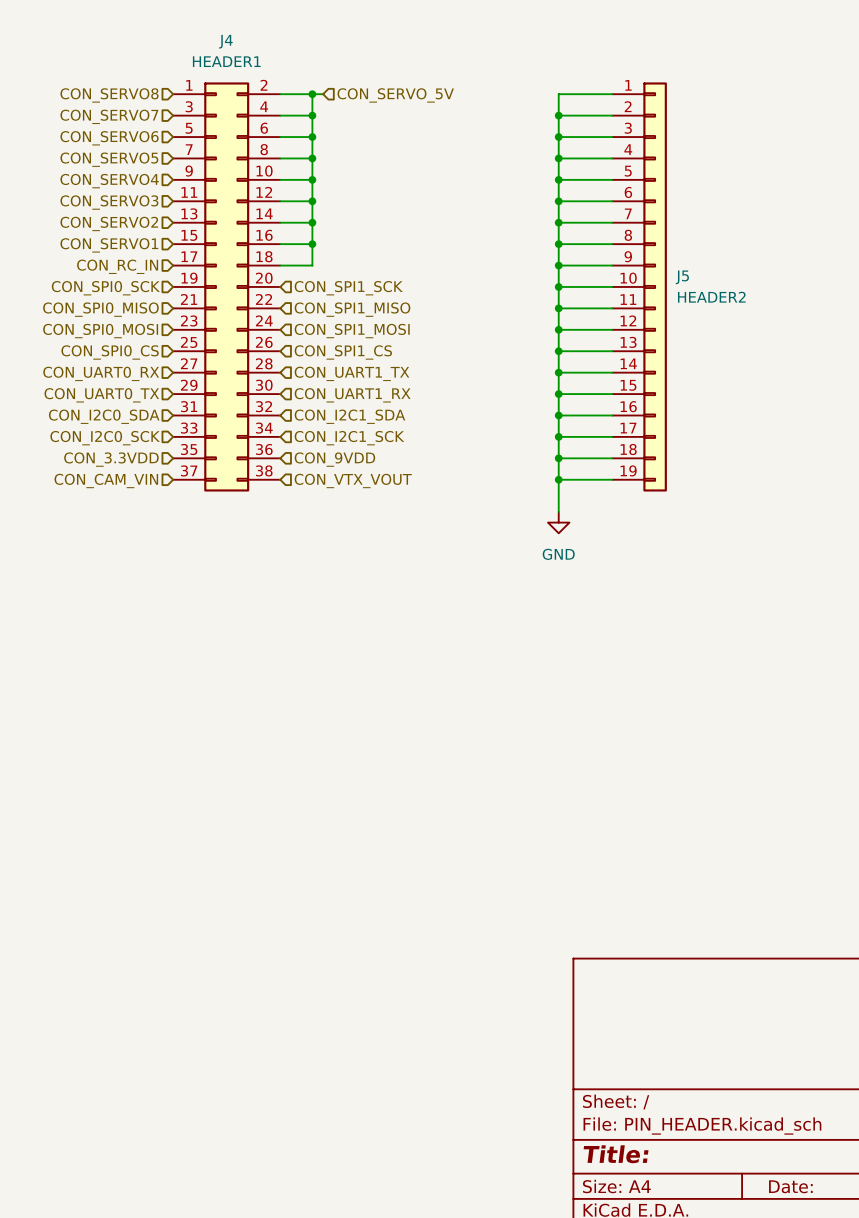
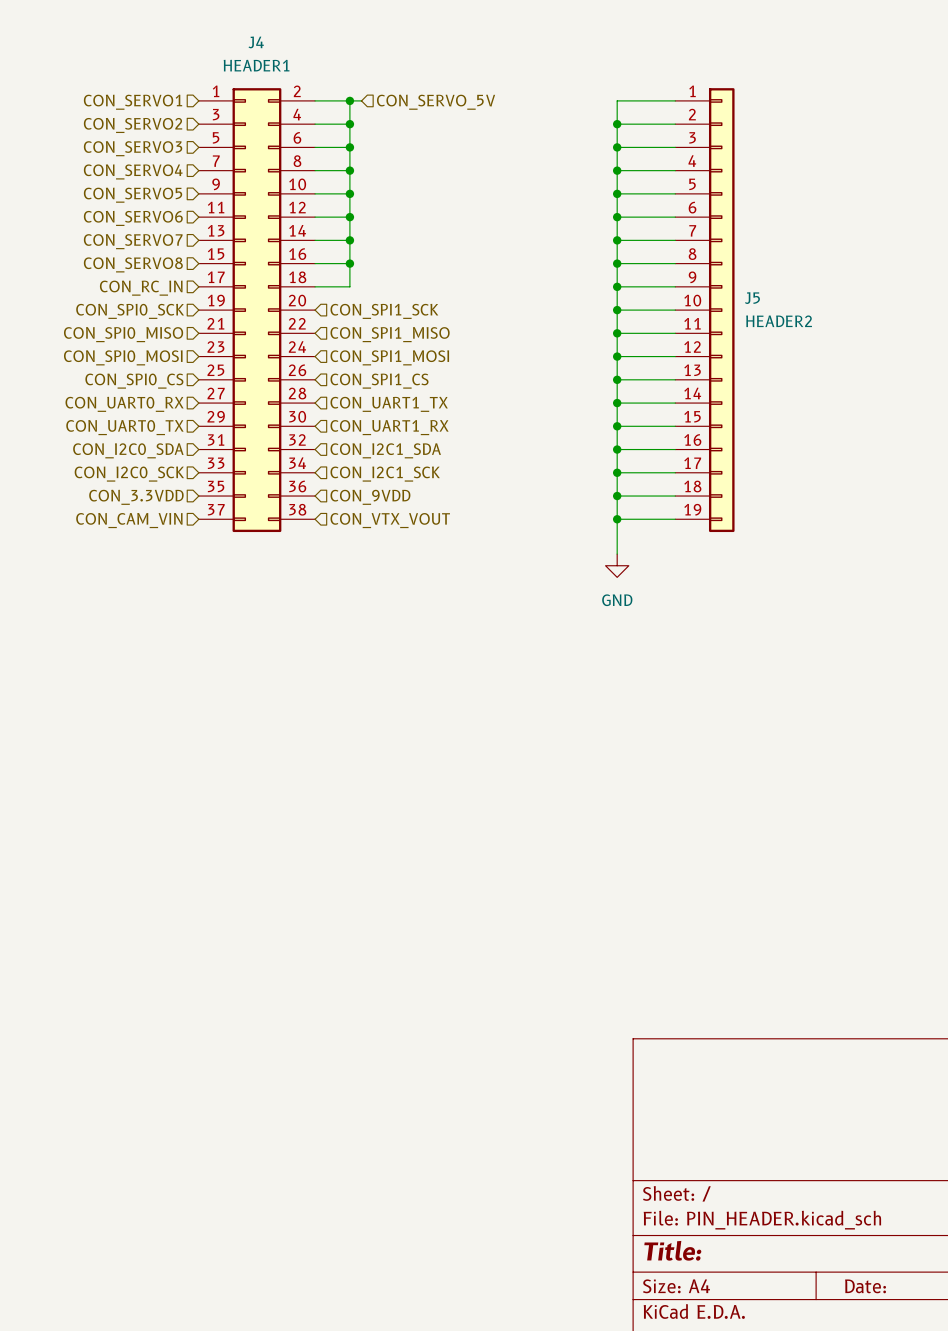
hierarchical label: CON_SERVO8 (109, 95) -> CON_SERVO1 (133, 102)
hierarchical label: CON_SERVO7 (109, 116) -> CON_SERVO2 (133, 125)
hierarchical label: CON_SERVO6 (109, 138) -> CON_SERVO3 (133, 148)
hierarchical label: CON_SERVO5 (109, 159) -> CON_SERVO4 (133, 171)
hierarchical label: CON_SERVO4 (109, 181) -> CON_SERVO5 (133, 195)
hierarchical label: CON_SERVO3 (109, 202) -> CON_SERVO6 (133, 218)
hierarchical label: CON_SERVO2 (109, 223) -> CON_SERVO7 (133, 241)
hierarchical label: CON_SERVO1 (109, 245) -> CON_SERVO8 (133, 264)

